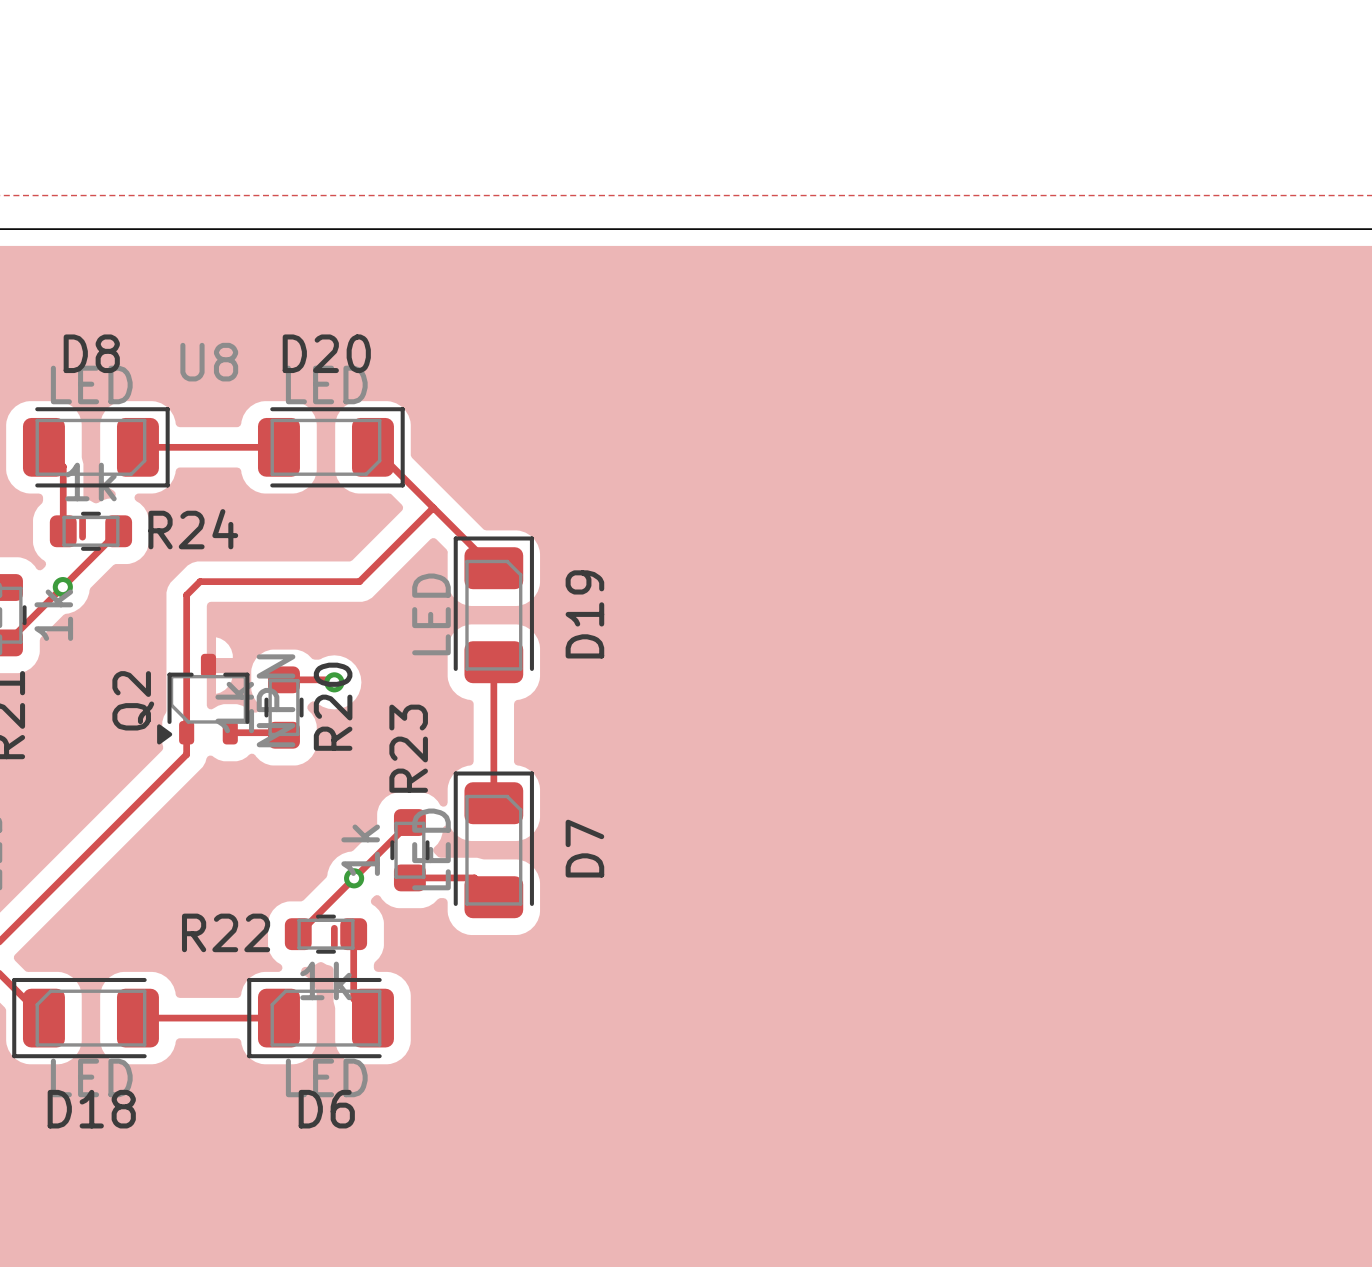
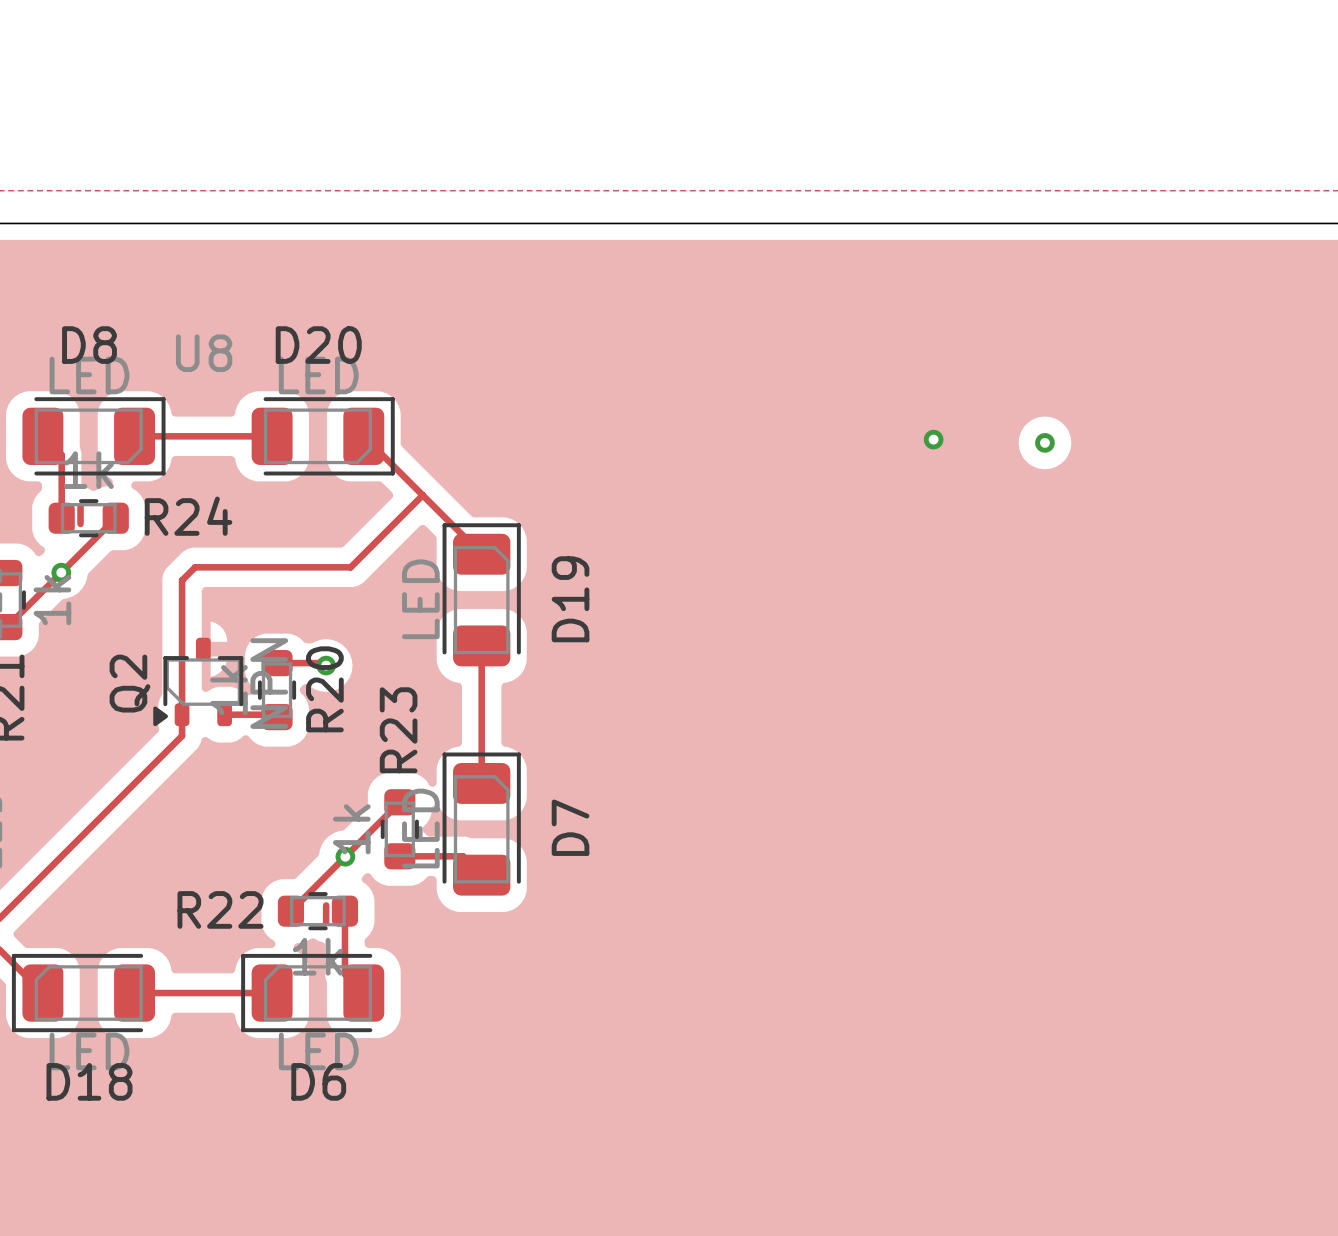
via: none -> (933, 439)
via: none -> (1044, 442)

